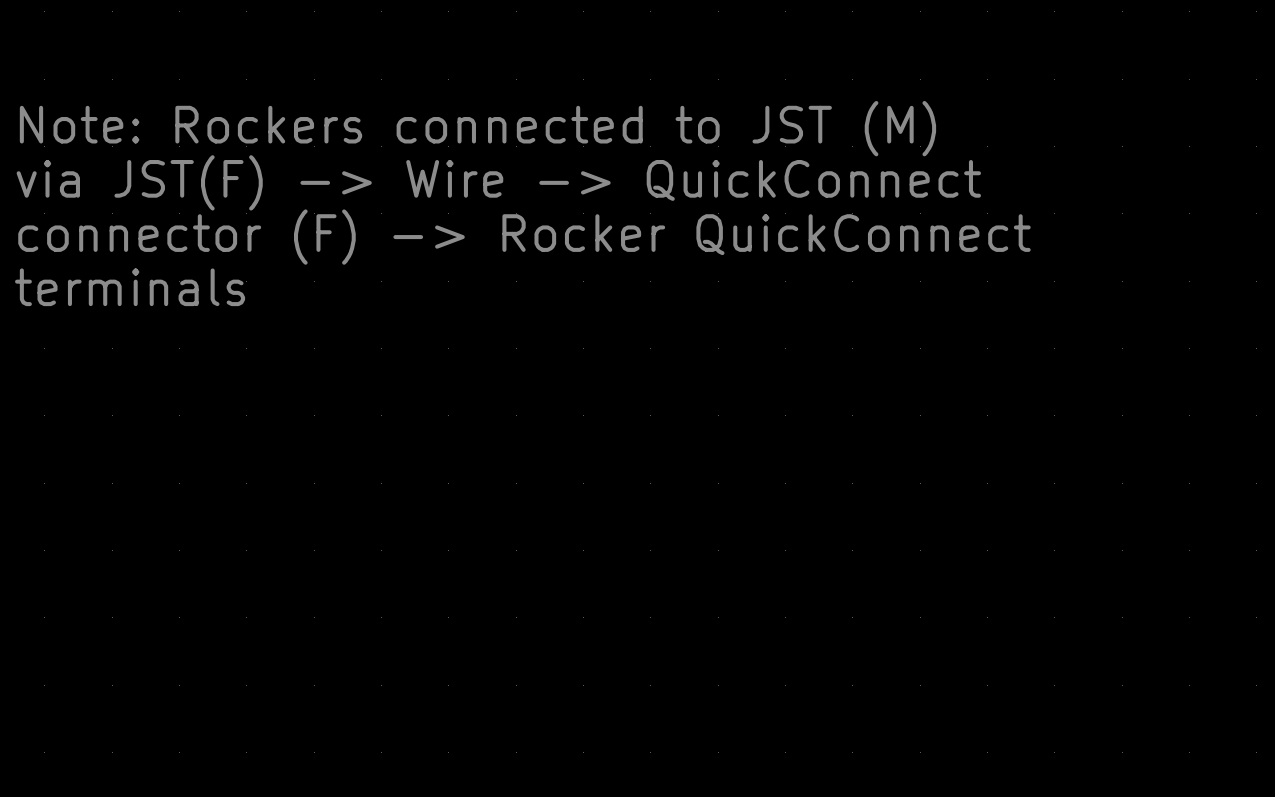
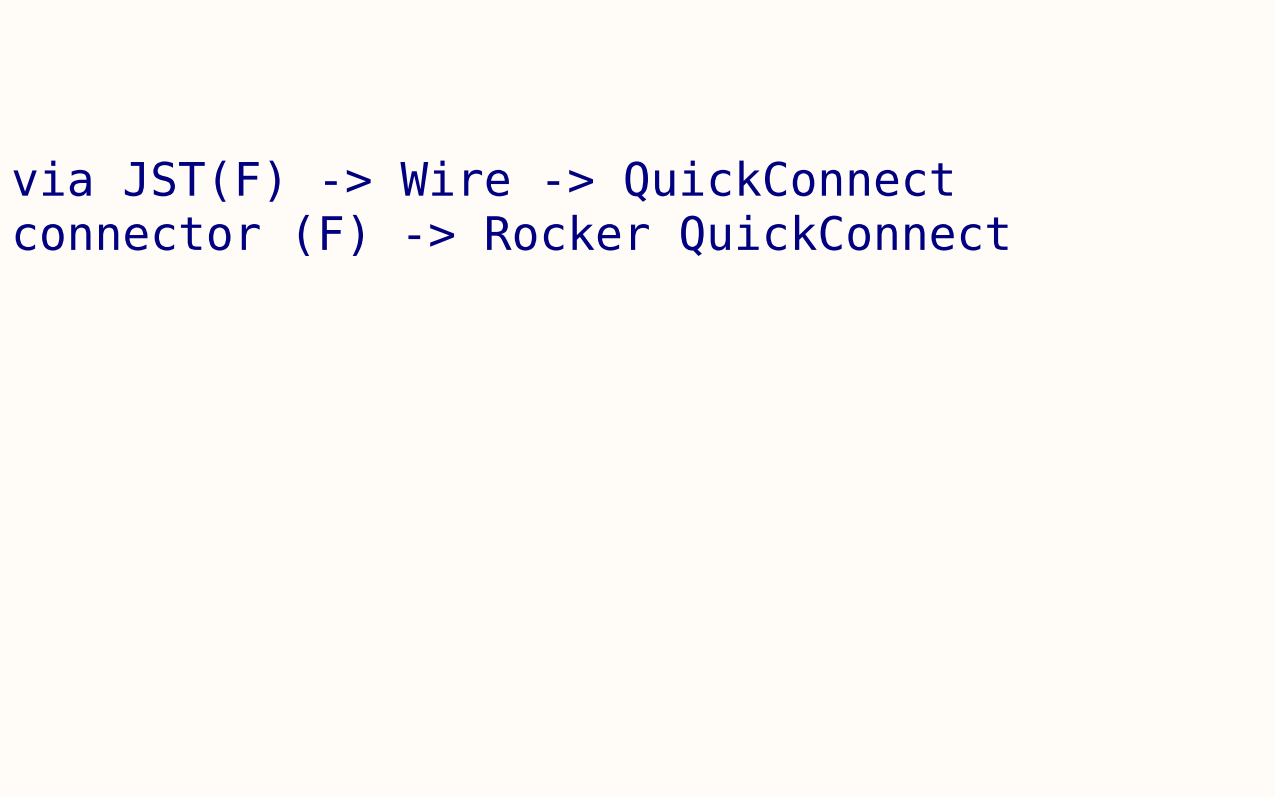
text: Note: Rockers connected to JST (M) (477, 128) -> none
text: terminals (130, 287) -> none

